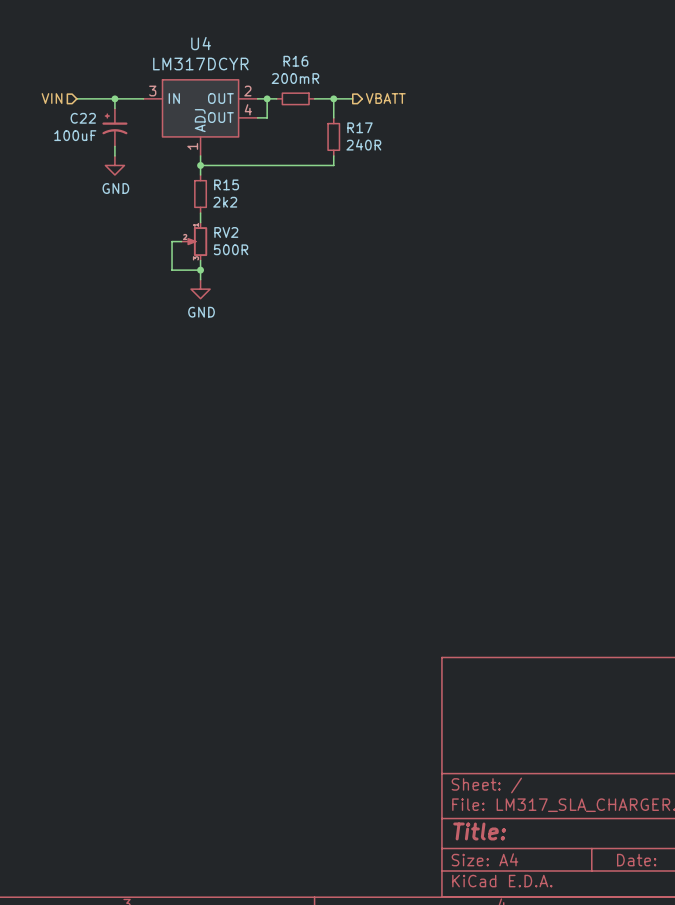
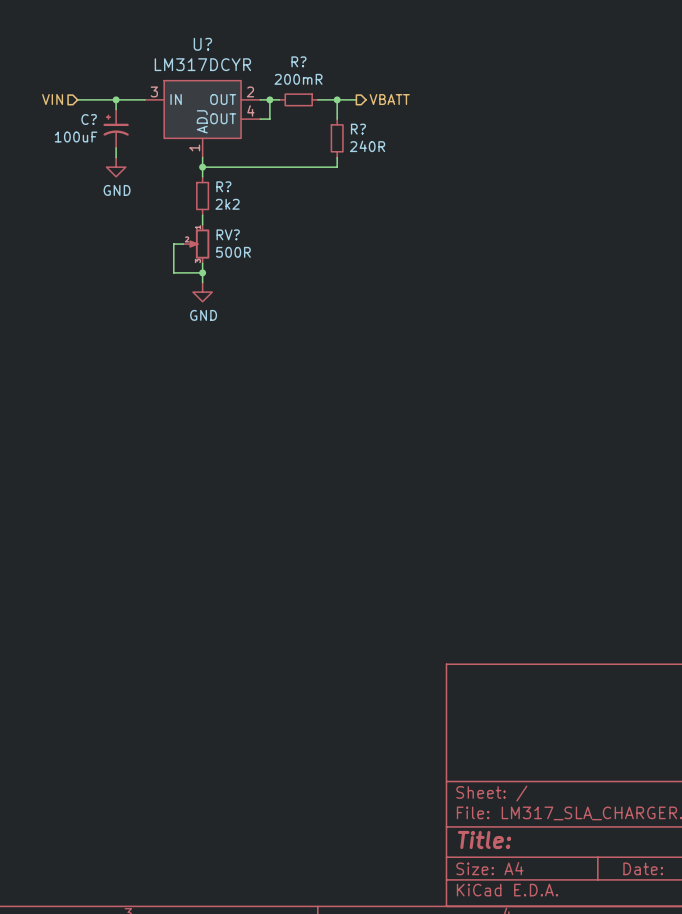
U4 name: U4 (201, 43) -> U? (202, 44)
R16 name: R16 (295, 61) -> R? (298, 61)
C22 name: C22 (83, 118) -> C? (89, 119)
R17 name: R17 (360, 127) -> R? (358, 129)
R15 name: R15 (226, 184) -> R? (223, 186)
RV2 name: RV2 (226, 232) -> RV? (228, 234)

